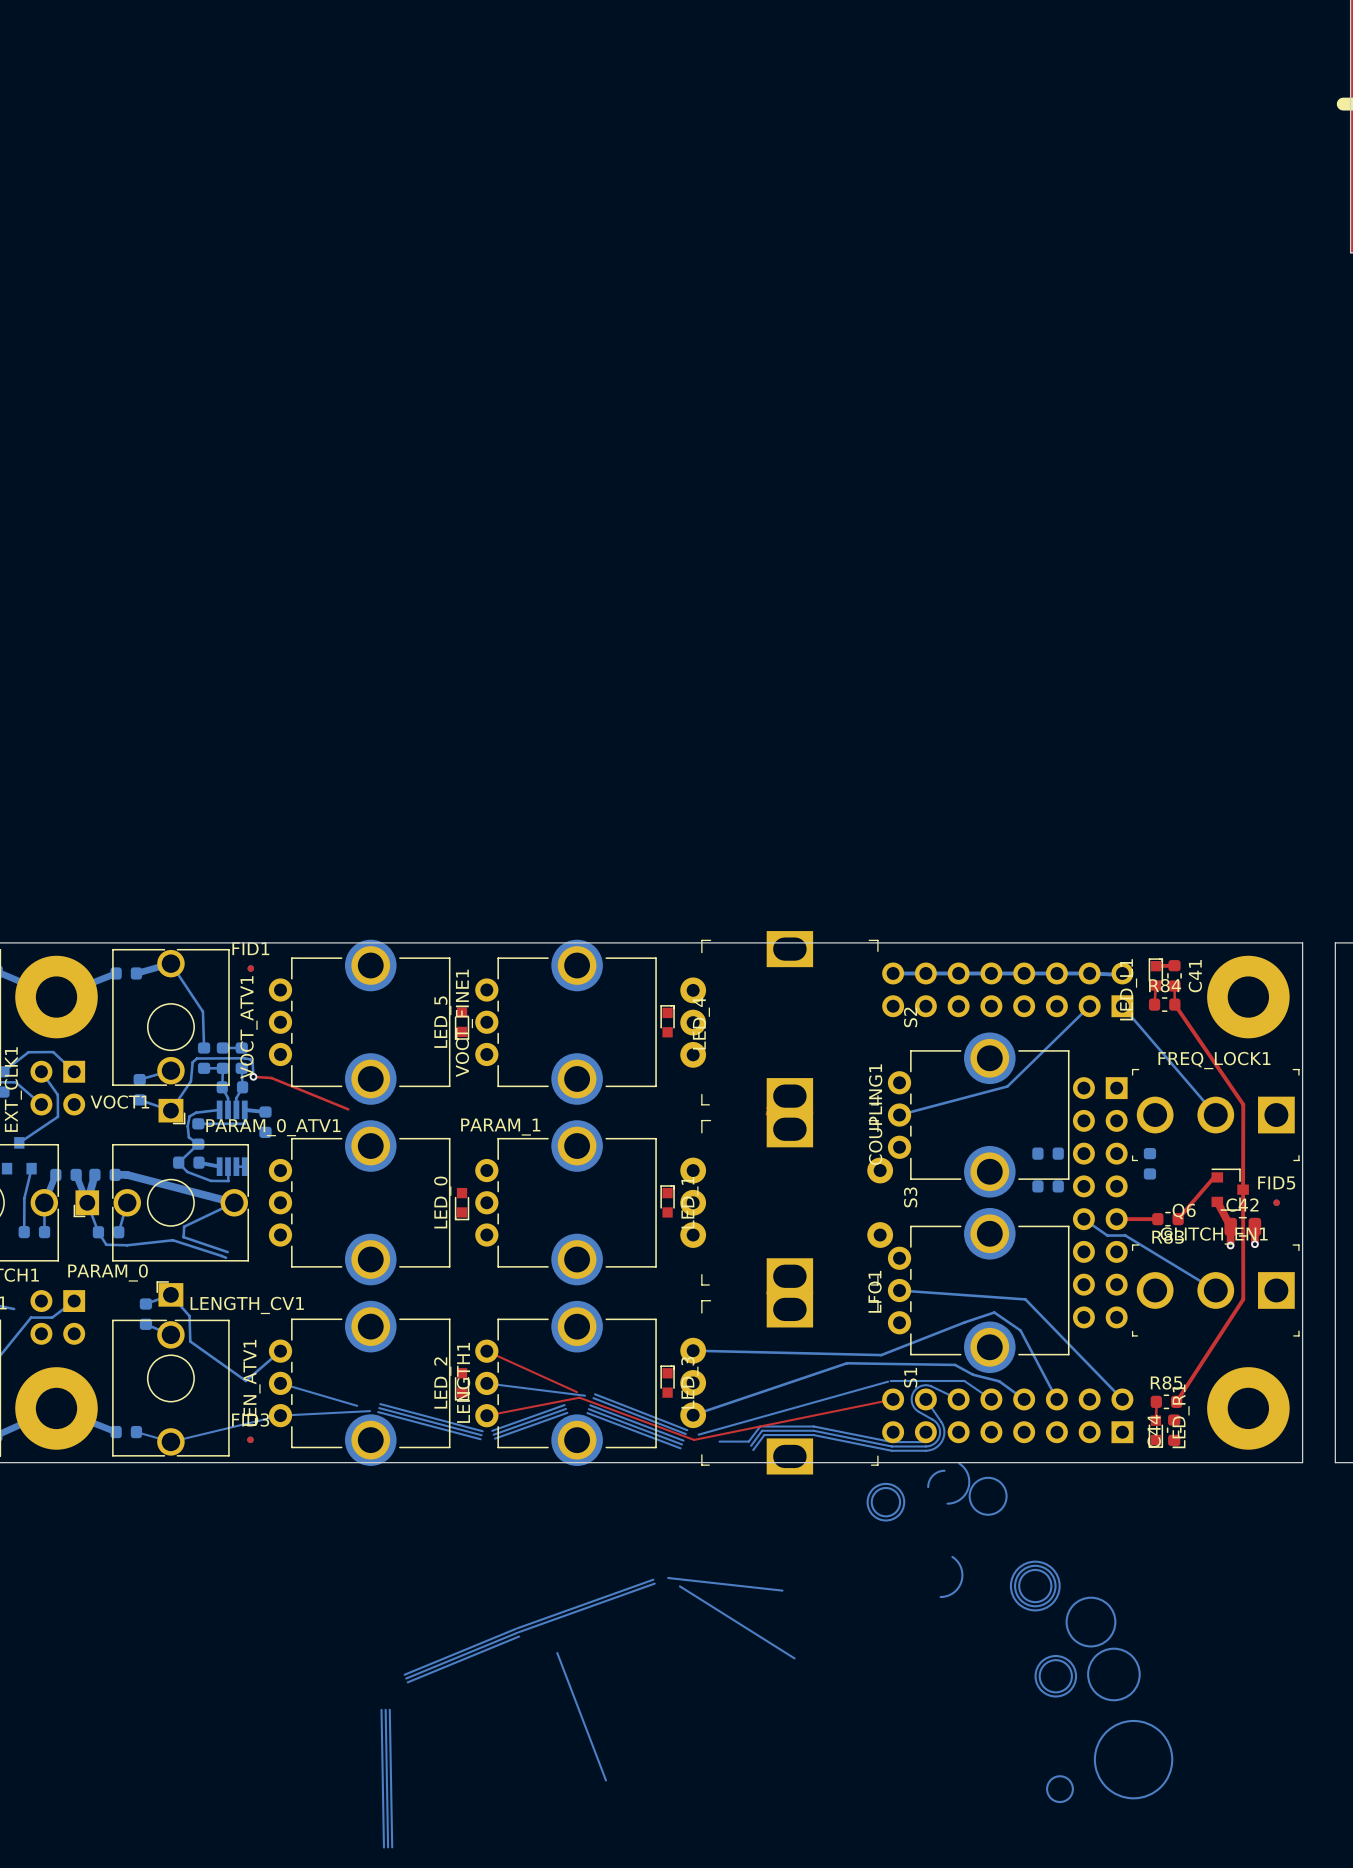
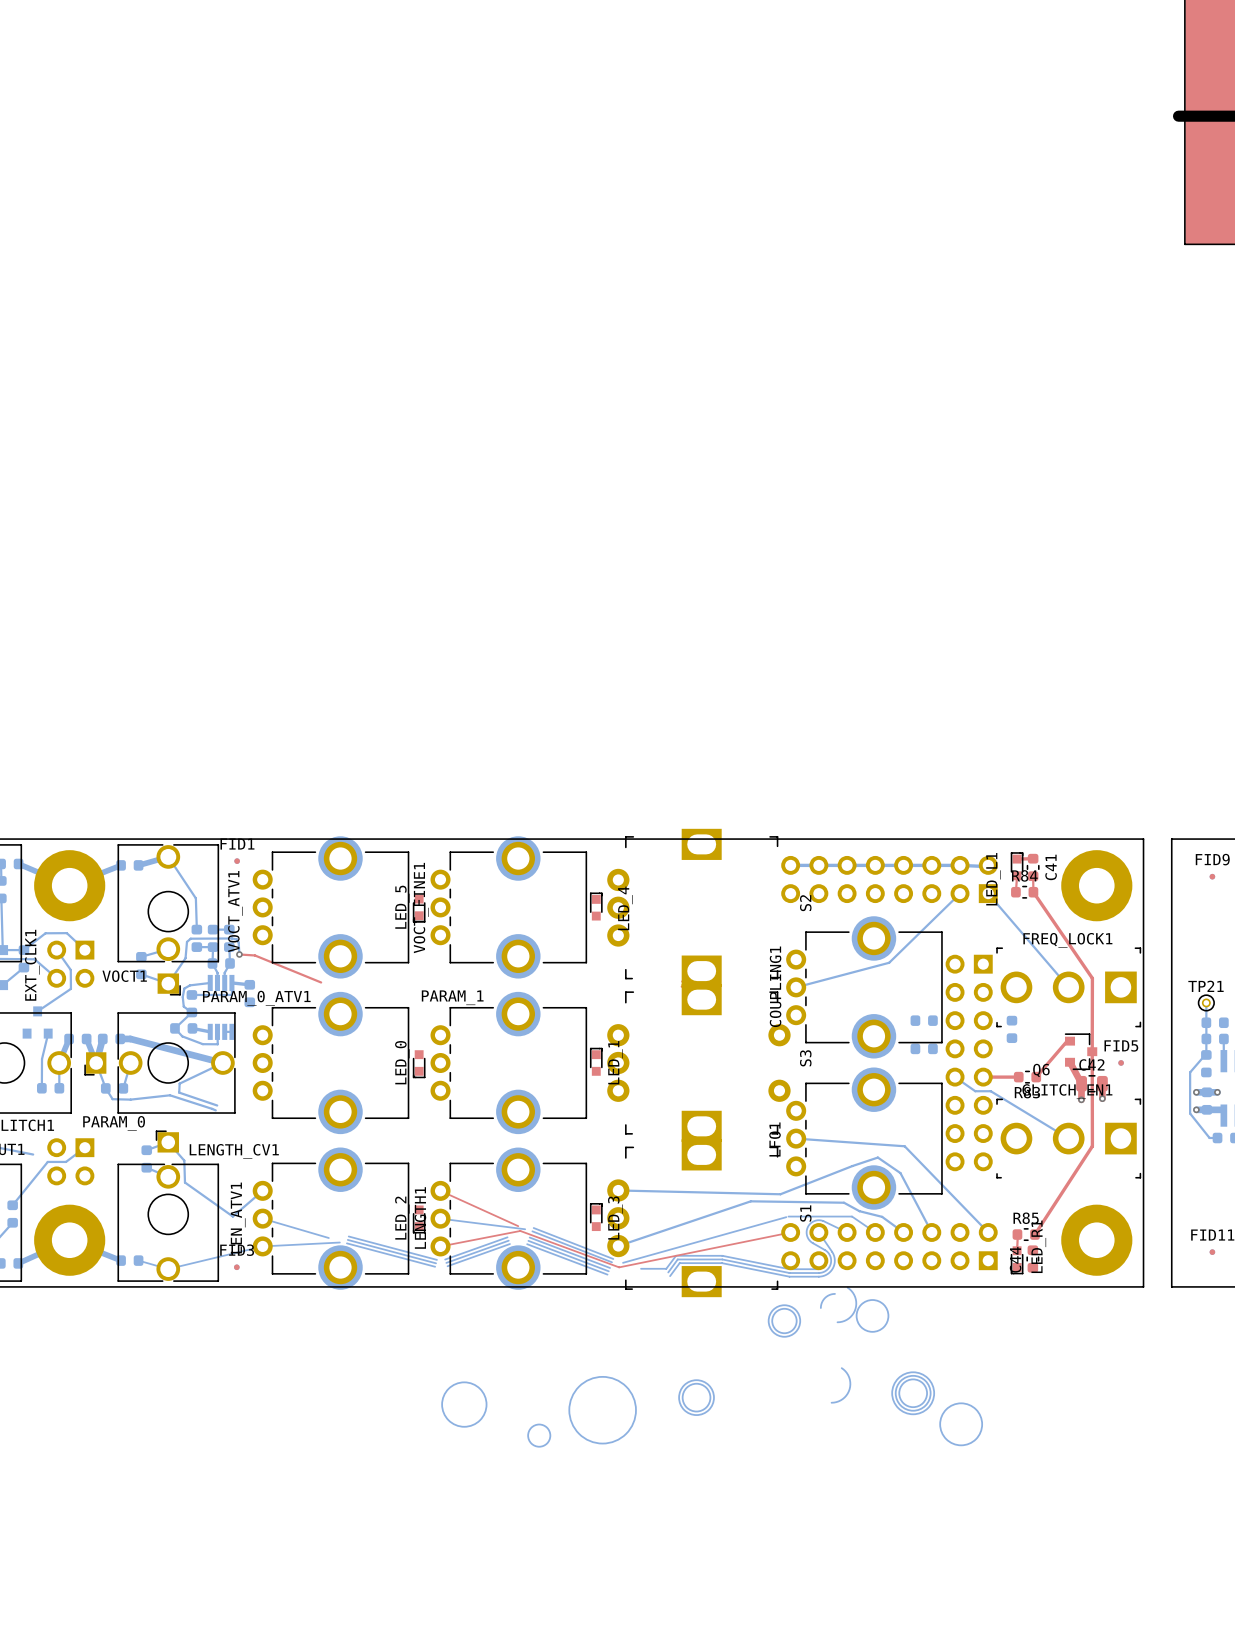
drawing: none -> [568, 1375, 637, 1445]
drawing: none -> [441, 1381, 488, 1428]
bottom track: (668, 1577) (782, 1590) -> none
bottom track: (653, 1579) (517, 1628) -> none
bottom track: (654, 1583) (519, 1632) -> none
bottom track: (679, 1586) (794, 1658) -> none
drawing: none -> [527, 1423, 552, 1448]
bottom track: (515, 1628) (404, 1674) -> none
bottom track: (517, 1632) (406, 1678) -> none
bottom track: (519, 1636) (407, 1682) -> none
drawing: [1087, 1647, 1141, 1702] -> none
bottom track: (557, 1652) (606, 1780) -> none
drawing position: (1055, 1676) -> (696, 1397)
drawing position: (1055, 1676) -> (696, 1397)
bottom track: (381, 1709) (383, 1847) -> none
bottom track: (385, 1709) (388, 1847) -> none
bottom track: (389, 1709) (392, 1847) -> none
drawing: [1093, 1719, 1174, 1800] -> none
drawing: [1046, 1775, 1074, 1804] -> none

